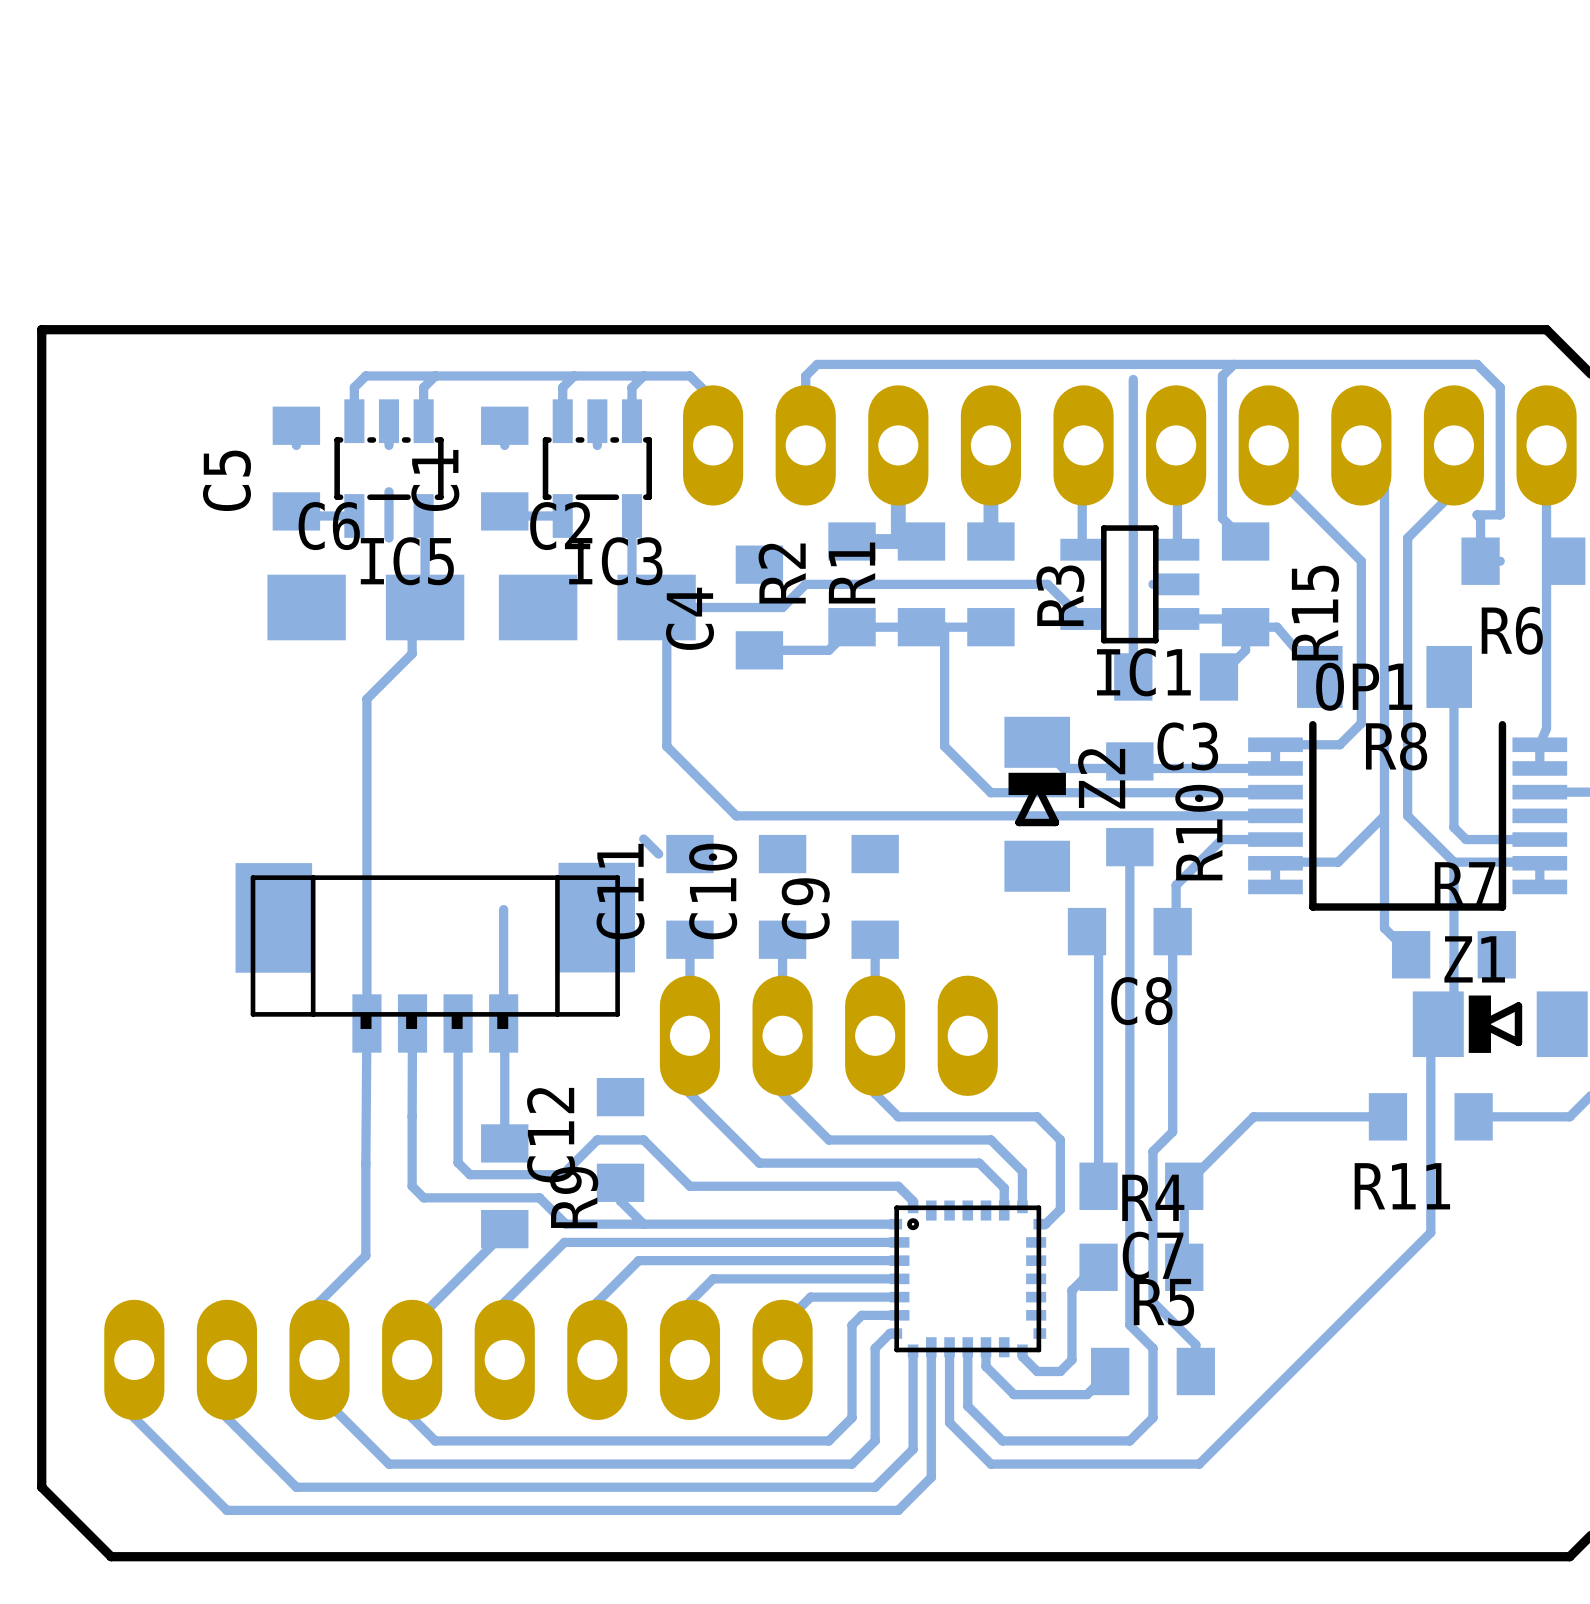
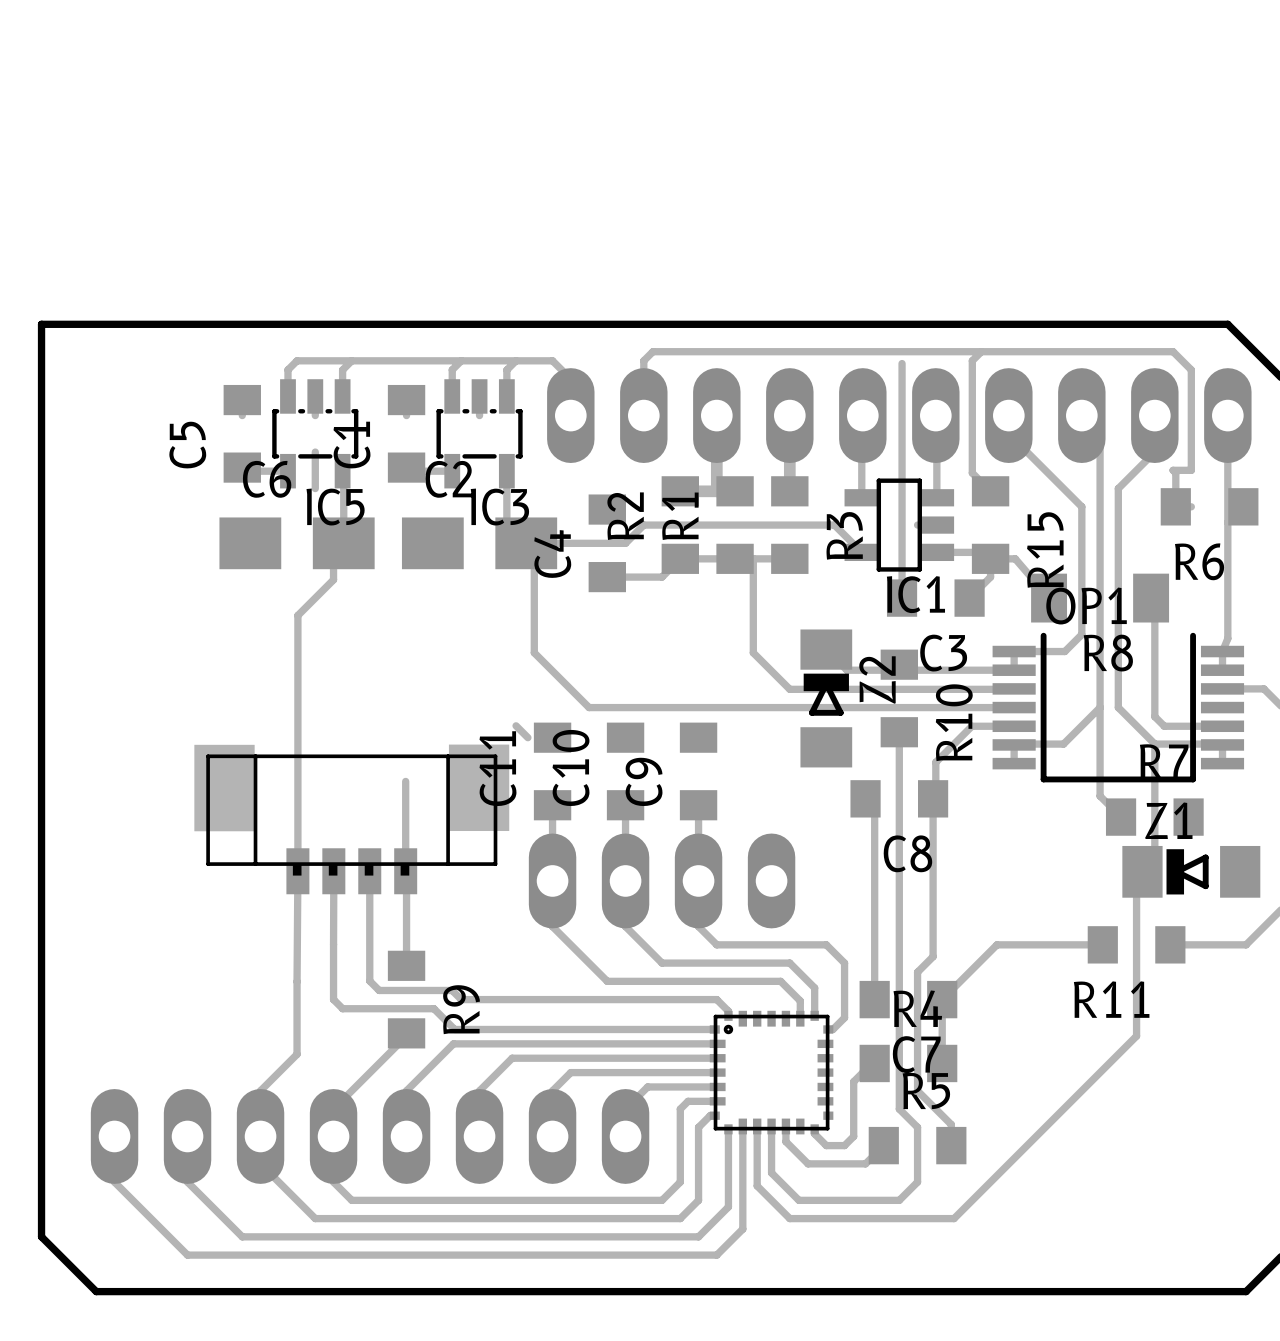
C12: (620, 1139) -> none
track: (562, 1174) (597, 1139) (643, 1139) (689, 1186) -> (452, 990) (461, 999) (552, 999)
track: (620, 1182) (620, 1201) (643, 1224) -> none

